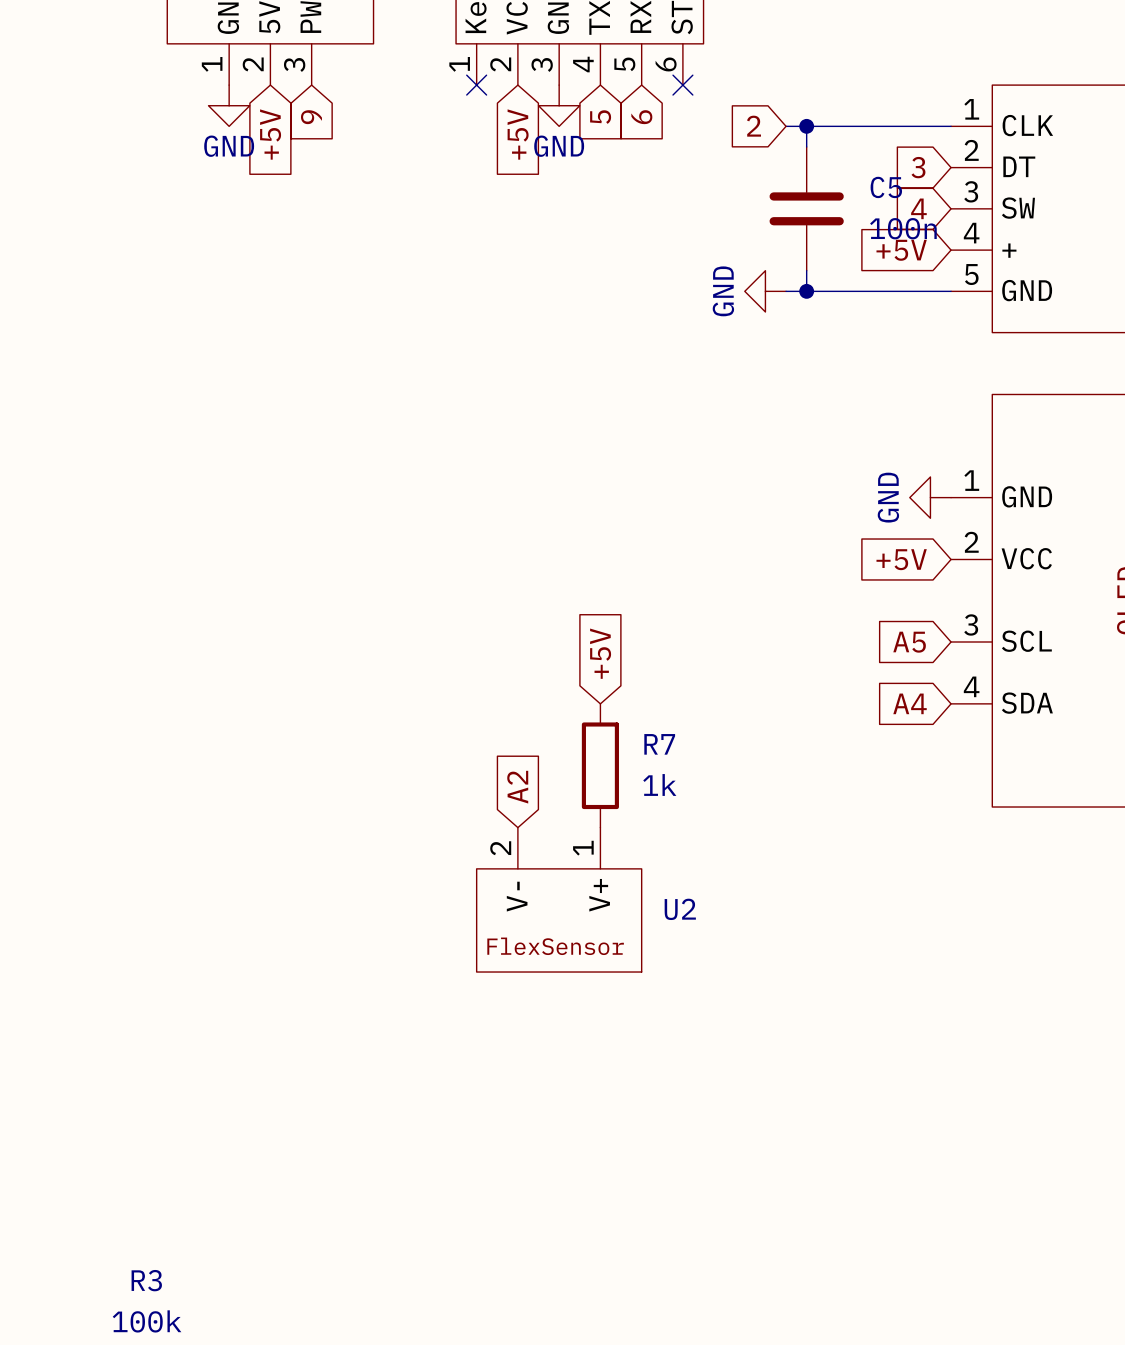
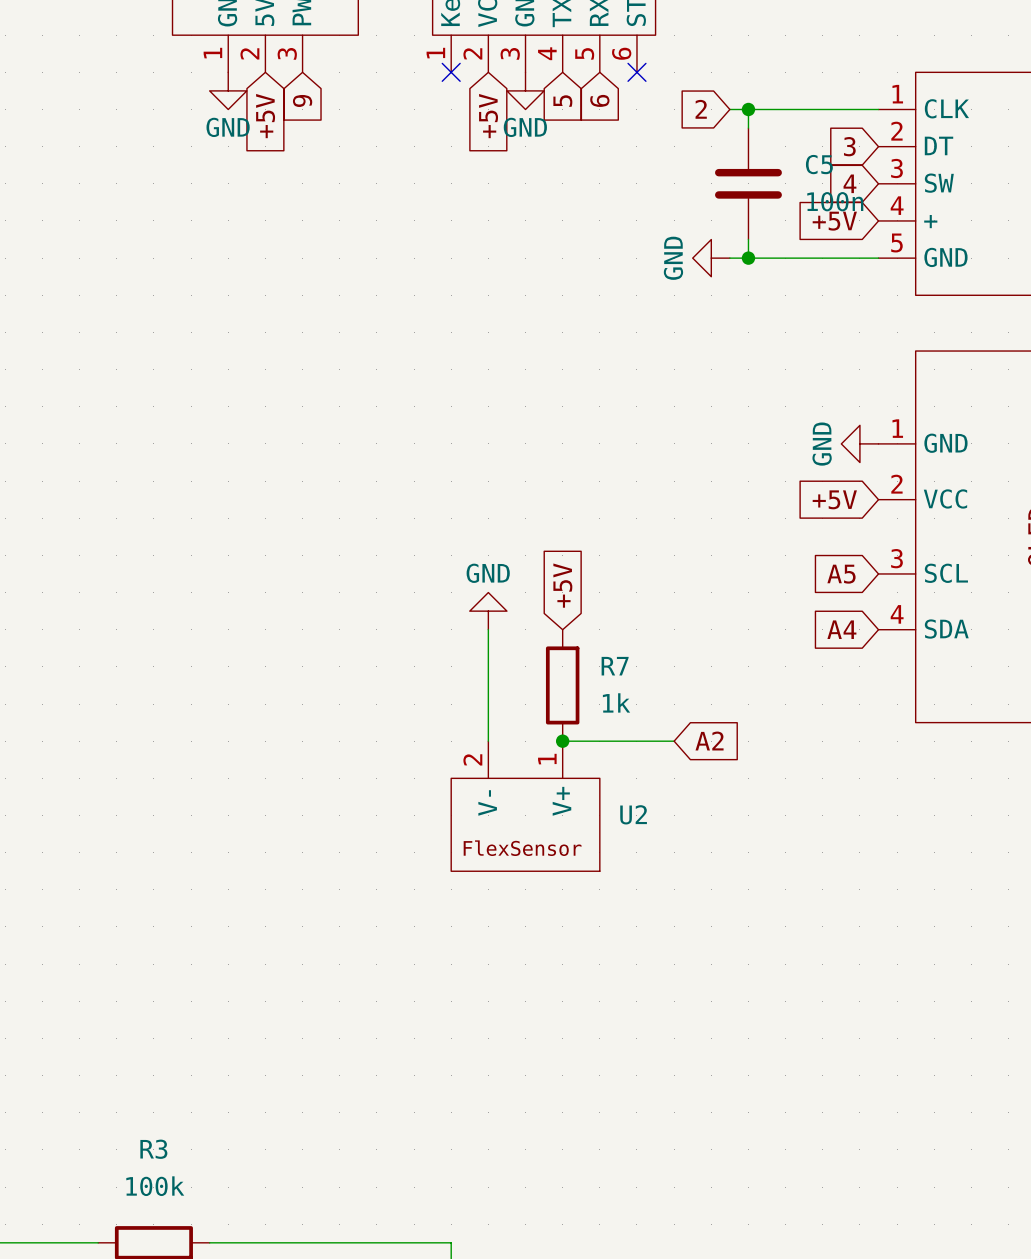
power symbol: none -> GND (488, 611)
wire: none -> (488, 629) (488, 741)
global label rotation: 0° (517, 787) -> 90° clockwise (709, 741)
global label position: A2 (517, 787) -> A2 (709, 741)
wire: none -> (562, 741) (674, 741)
junction: none -> (562, 741)

